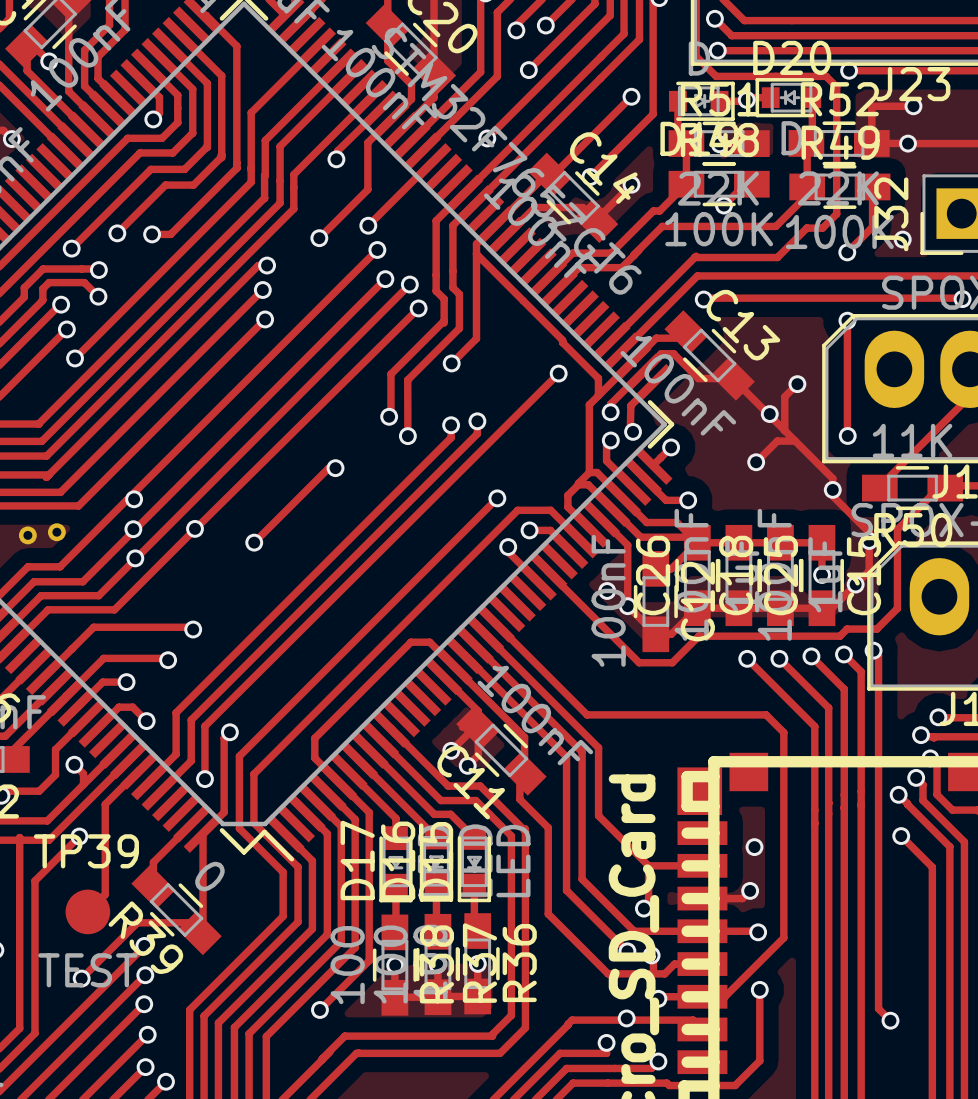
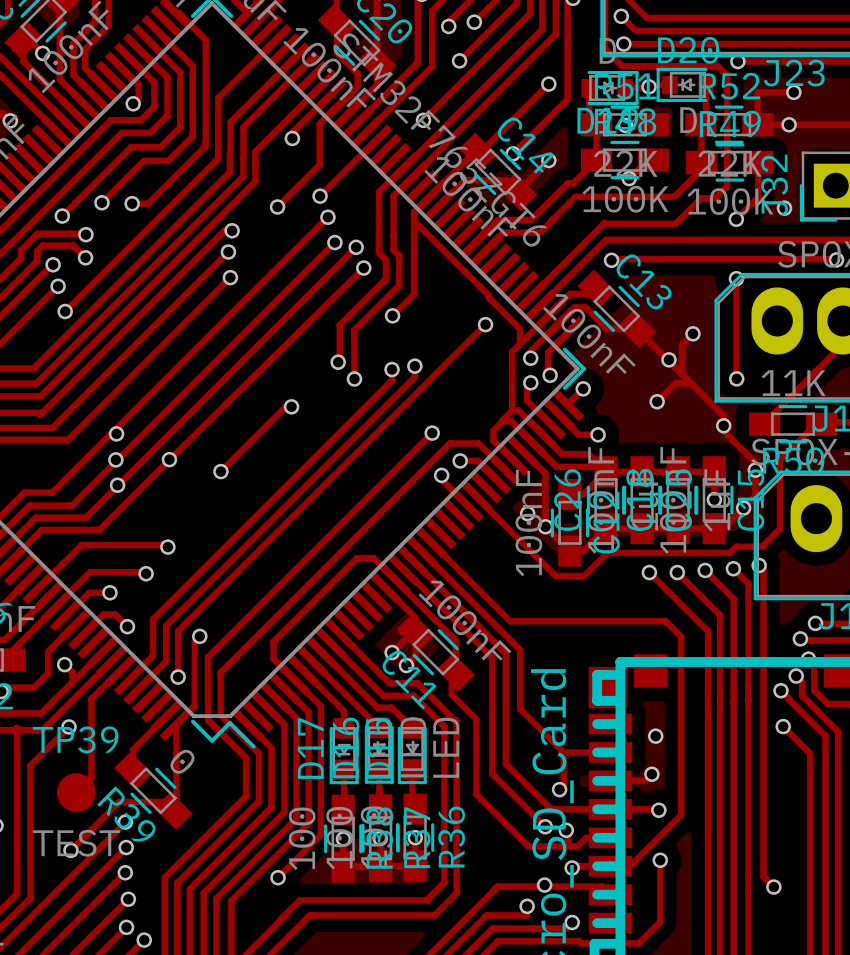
part: (56, 532) -> none
part: (27, 535) -> none

